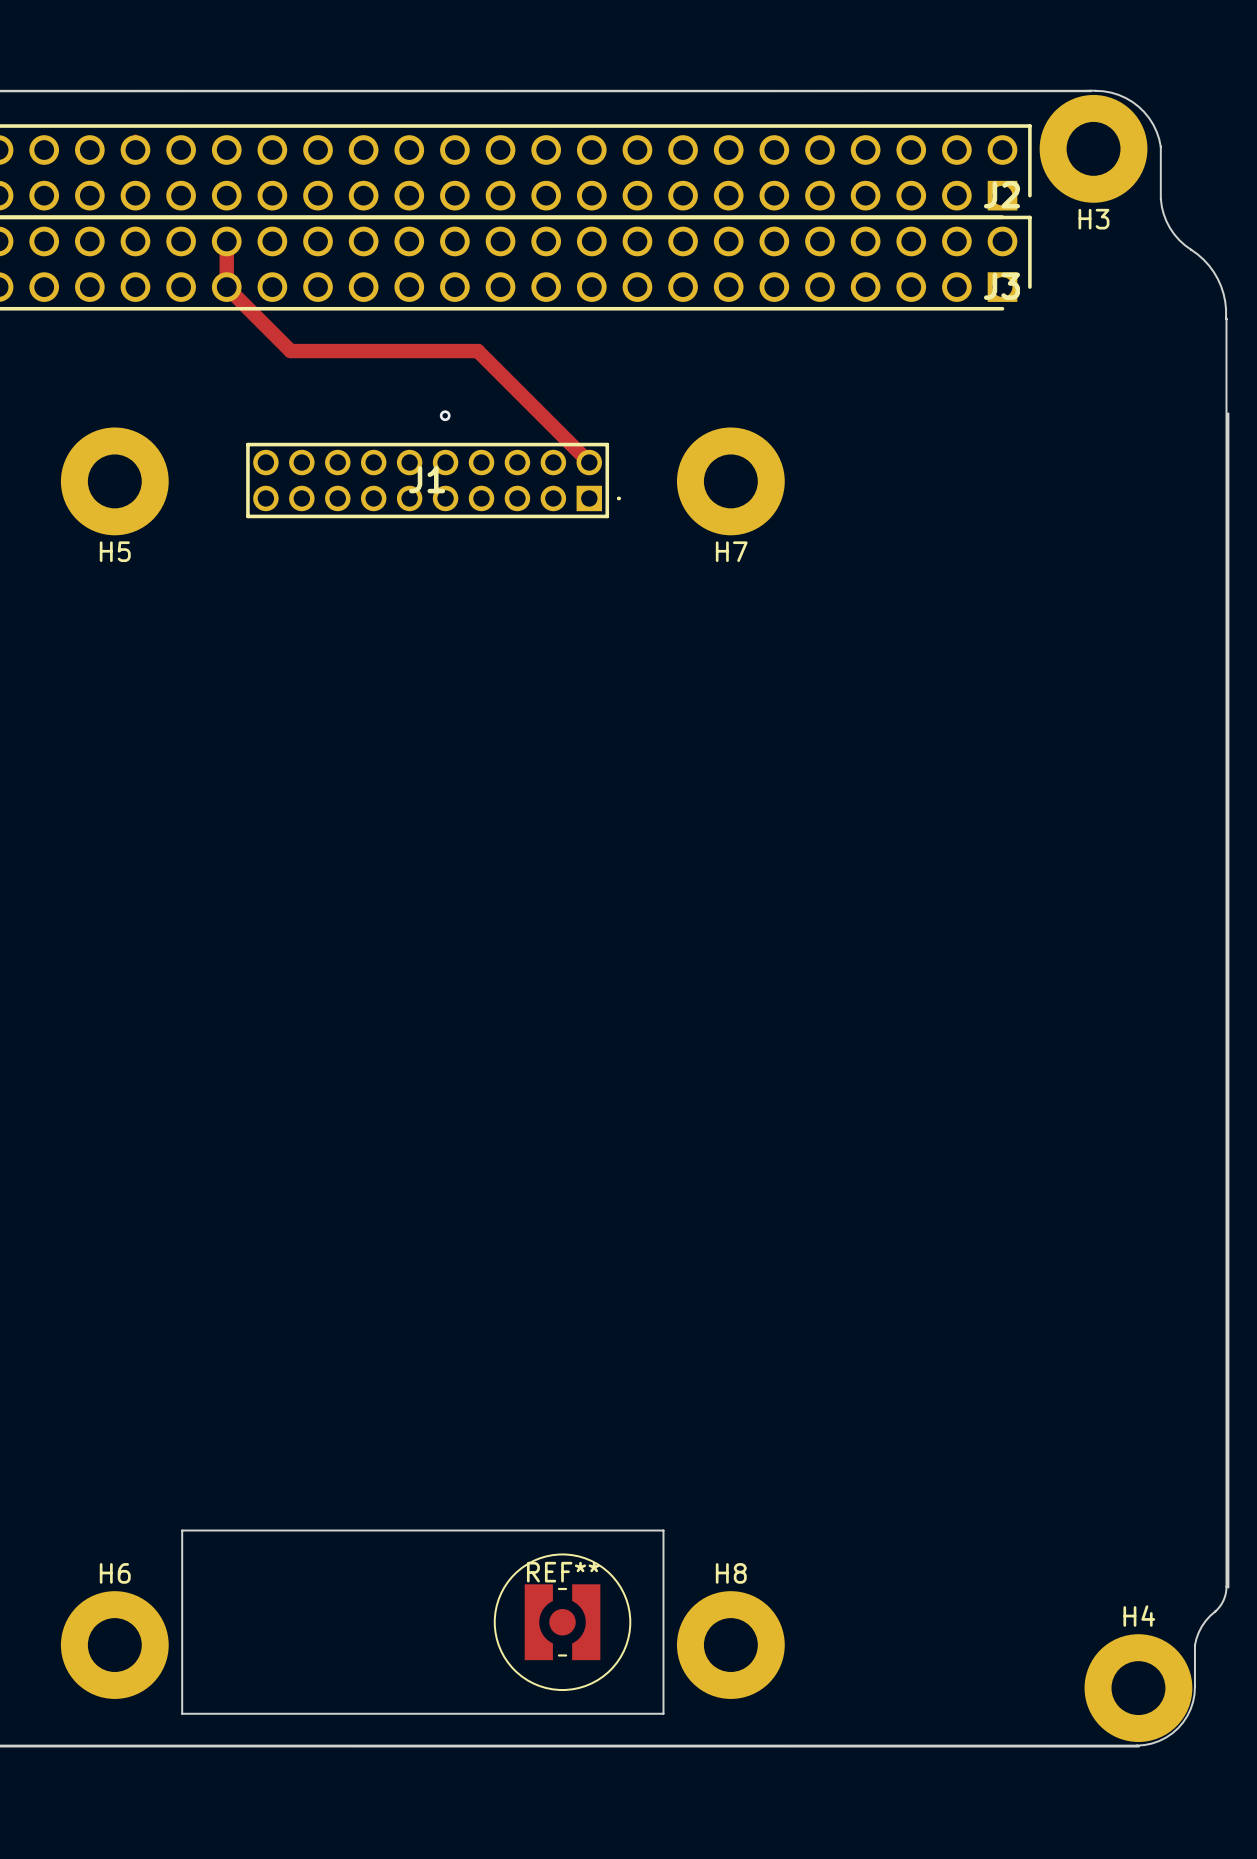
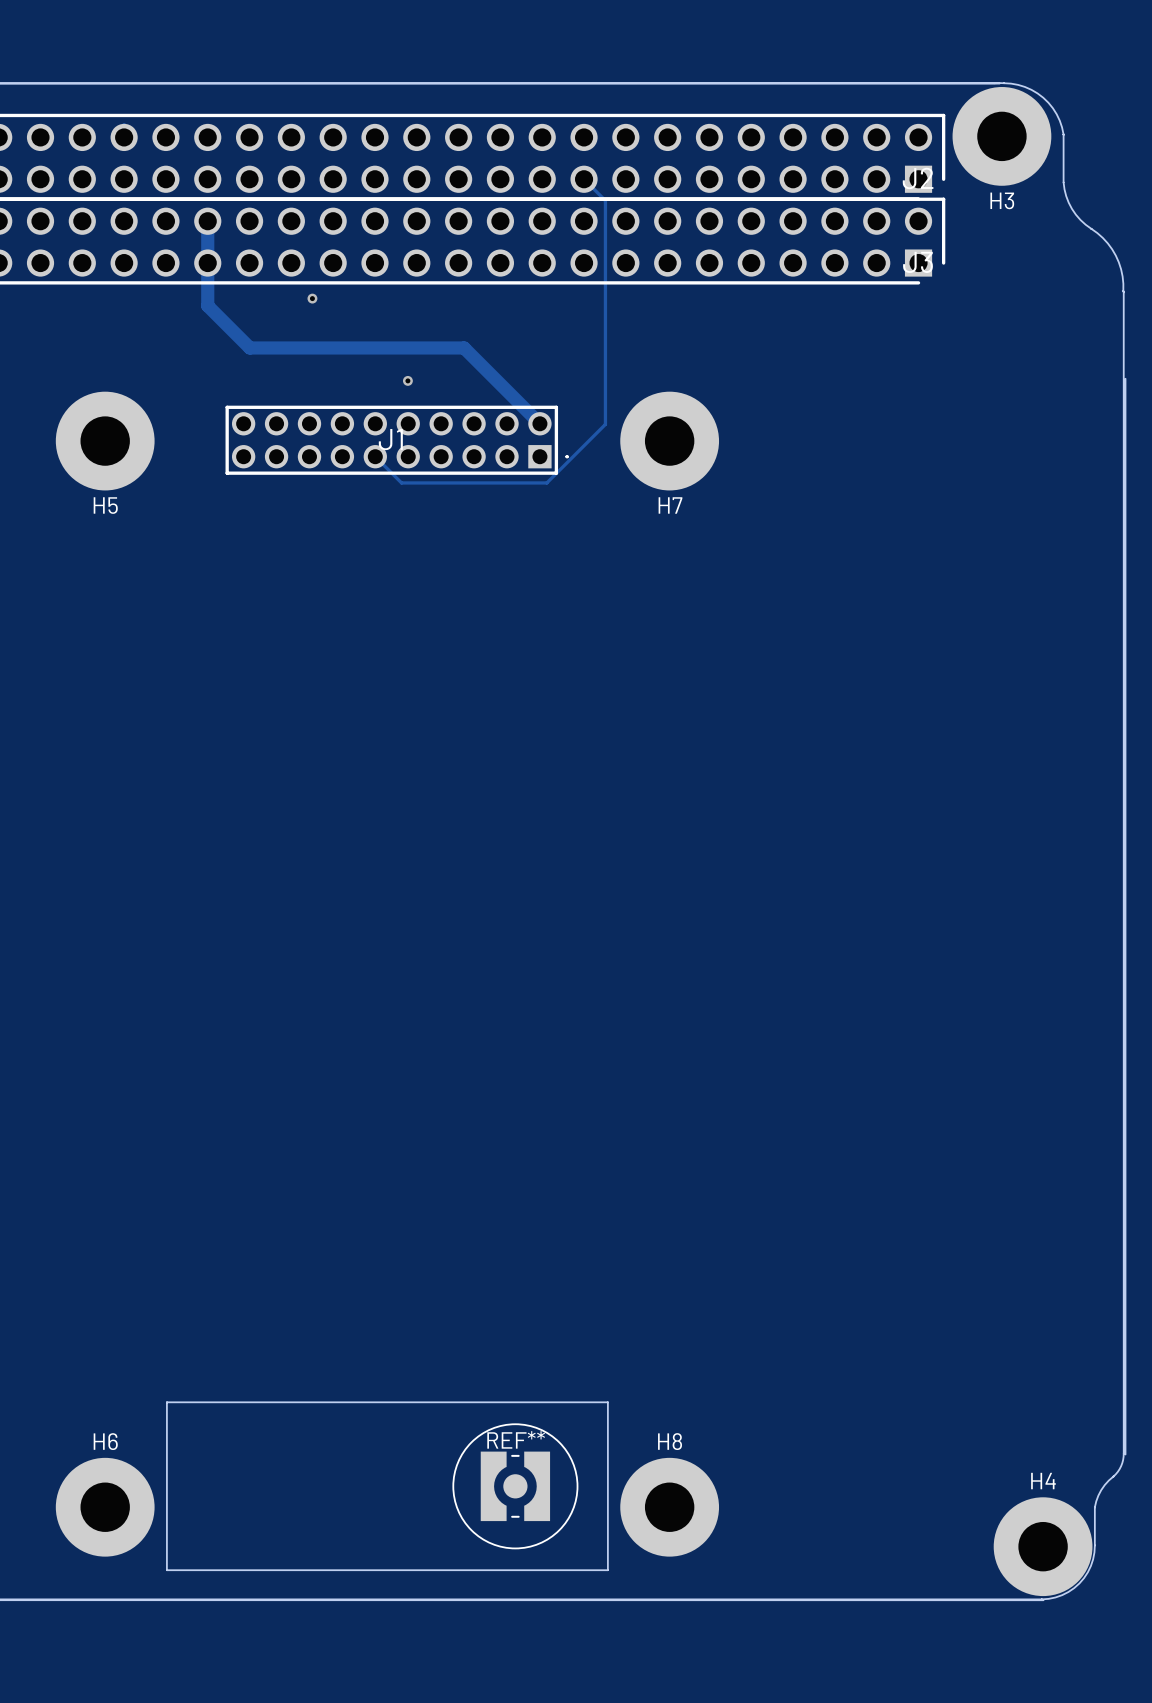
track: none -> (584, 179) (605, 200) (605, 424) (546, 482) (401, 482) (375, 456)
track: (226, 287) (290, 351) (477, 351) (506, 379) -> (207, 263) (207, 305) (249, 347) (464, 347)
via: none -> (312, 298)

